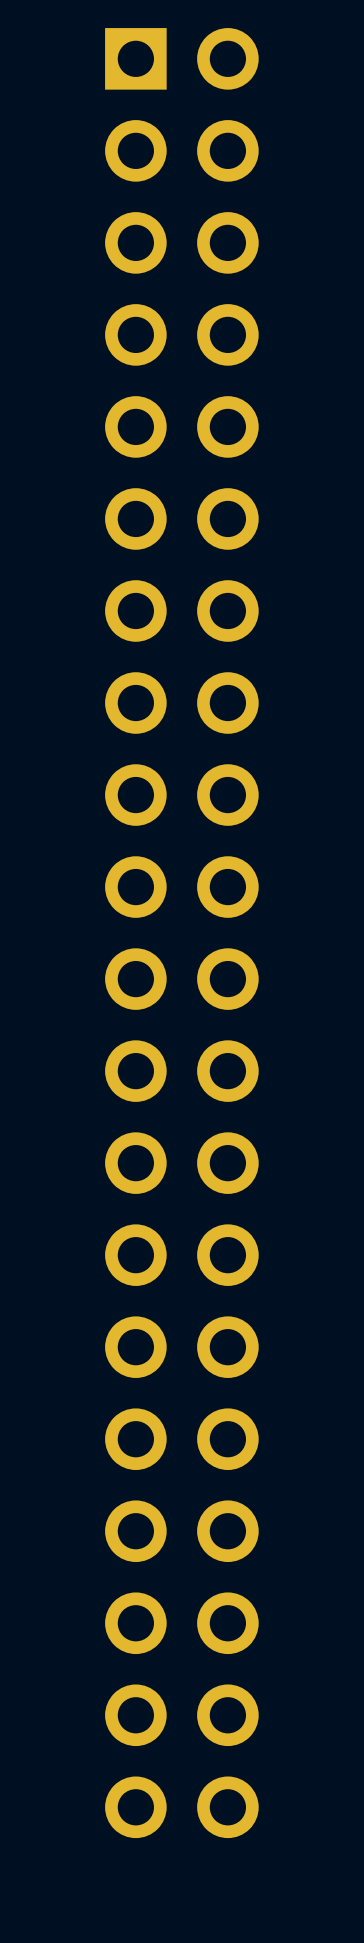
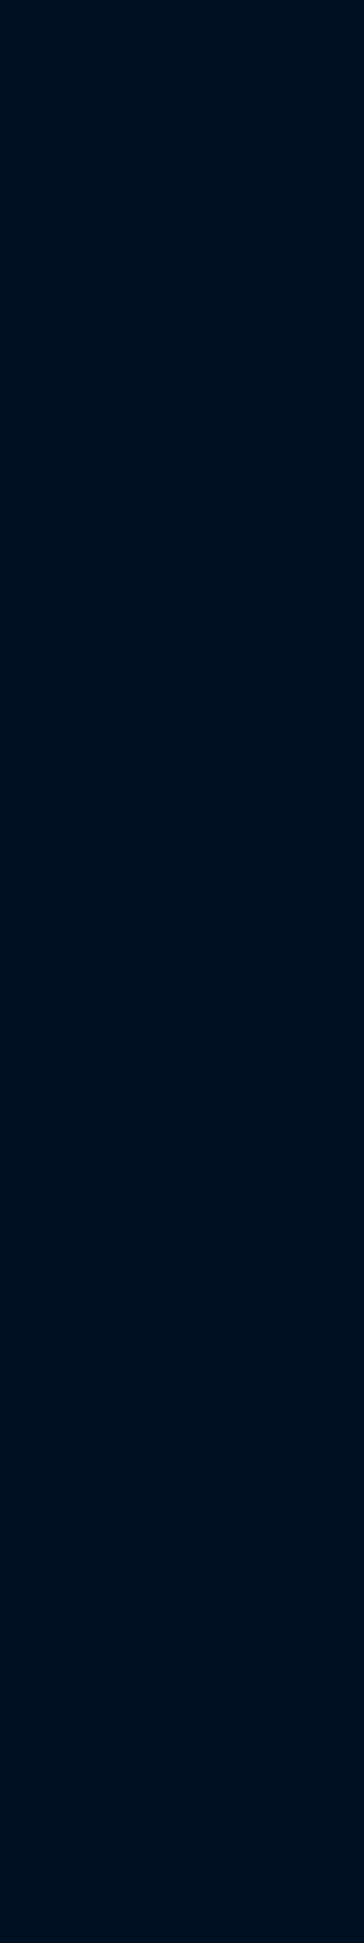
part: (181, 933) -> none

